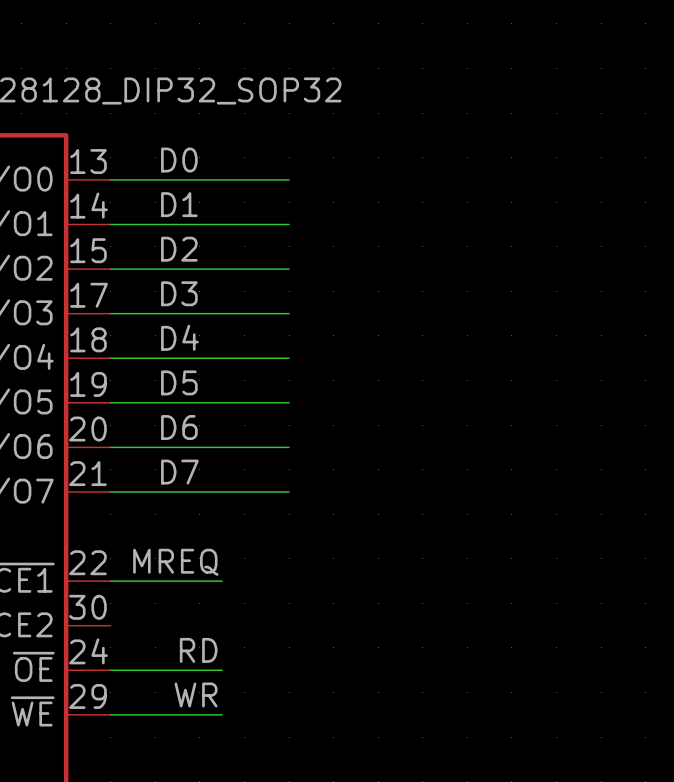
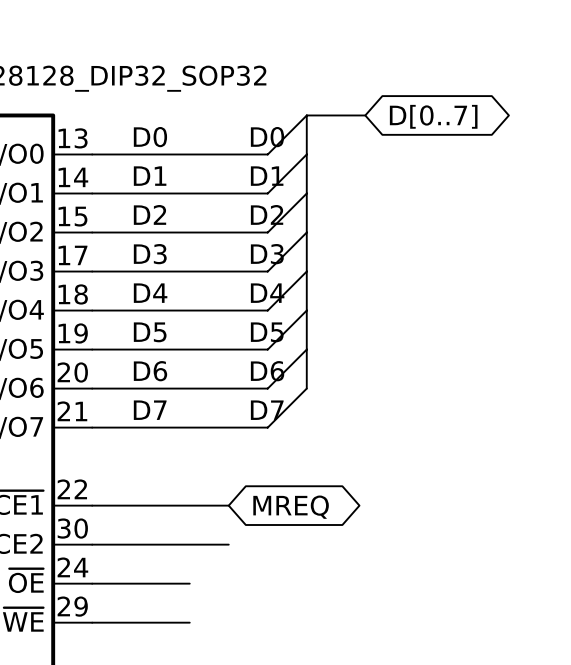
wire: none -> (306, 115) (267, 154) (248, 154)
bus: none -> (365, 115) (306, 115) (306, 388)
global label: none -> D[0..7] (433, 116)
label: none -> D0 (267, 137)
wire: none -> (306, 154) (267, 193) (248, 193)
label: none -> D1 (267, 176)
wire: none -> (306, 193) (267, 232) (248, 232)
label: none -> D2 (267, 214)
wire: none -> (306, 232) (267, 271) (248, 271)
label: none -> D3 (267, 254)
wire: none -> (306, 271) (267, 310) (248, 310)
label: none -> D4 (267, 293)
wire: none -> (306, 310) (267, 349) (248, 349)
label: none -> D5 (267, 332)
wire: none -> (306, 349) (267, 388) (248, 388)
label: none -> D6 (267, 371)
wire: none -> (306, 388) (267, 427) (248, 427)
label: none -> D7 (267, 410)
label: MREQ (175, 562) -> none
wire: none -> (189, 505) (228, 505)
global label: none -> MREQ (291, 507)
wire: none -> (92, 544) (228, 544)
label: RD (198, 650) -> none
label: WR (196, 694) -> none

